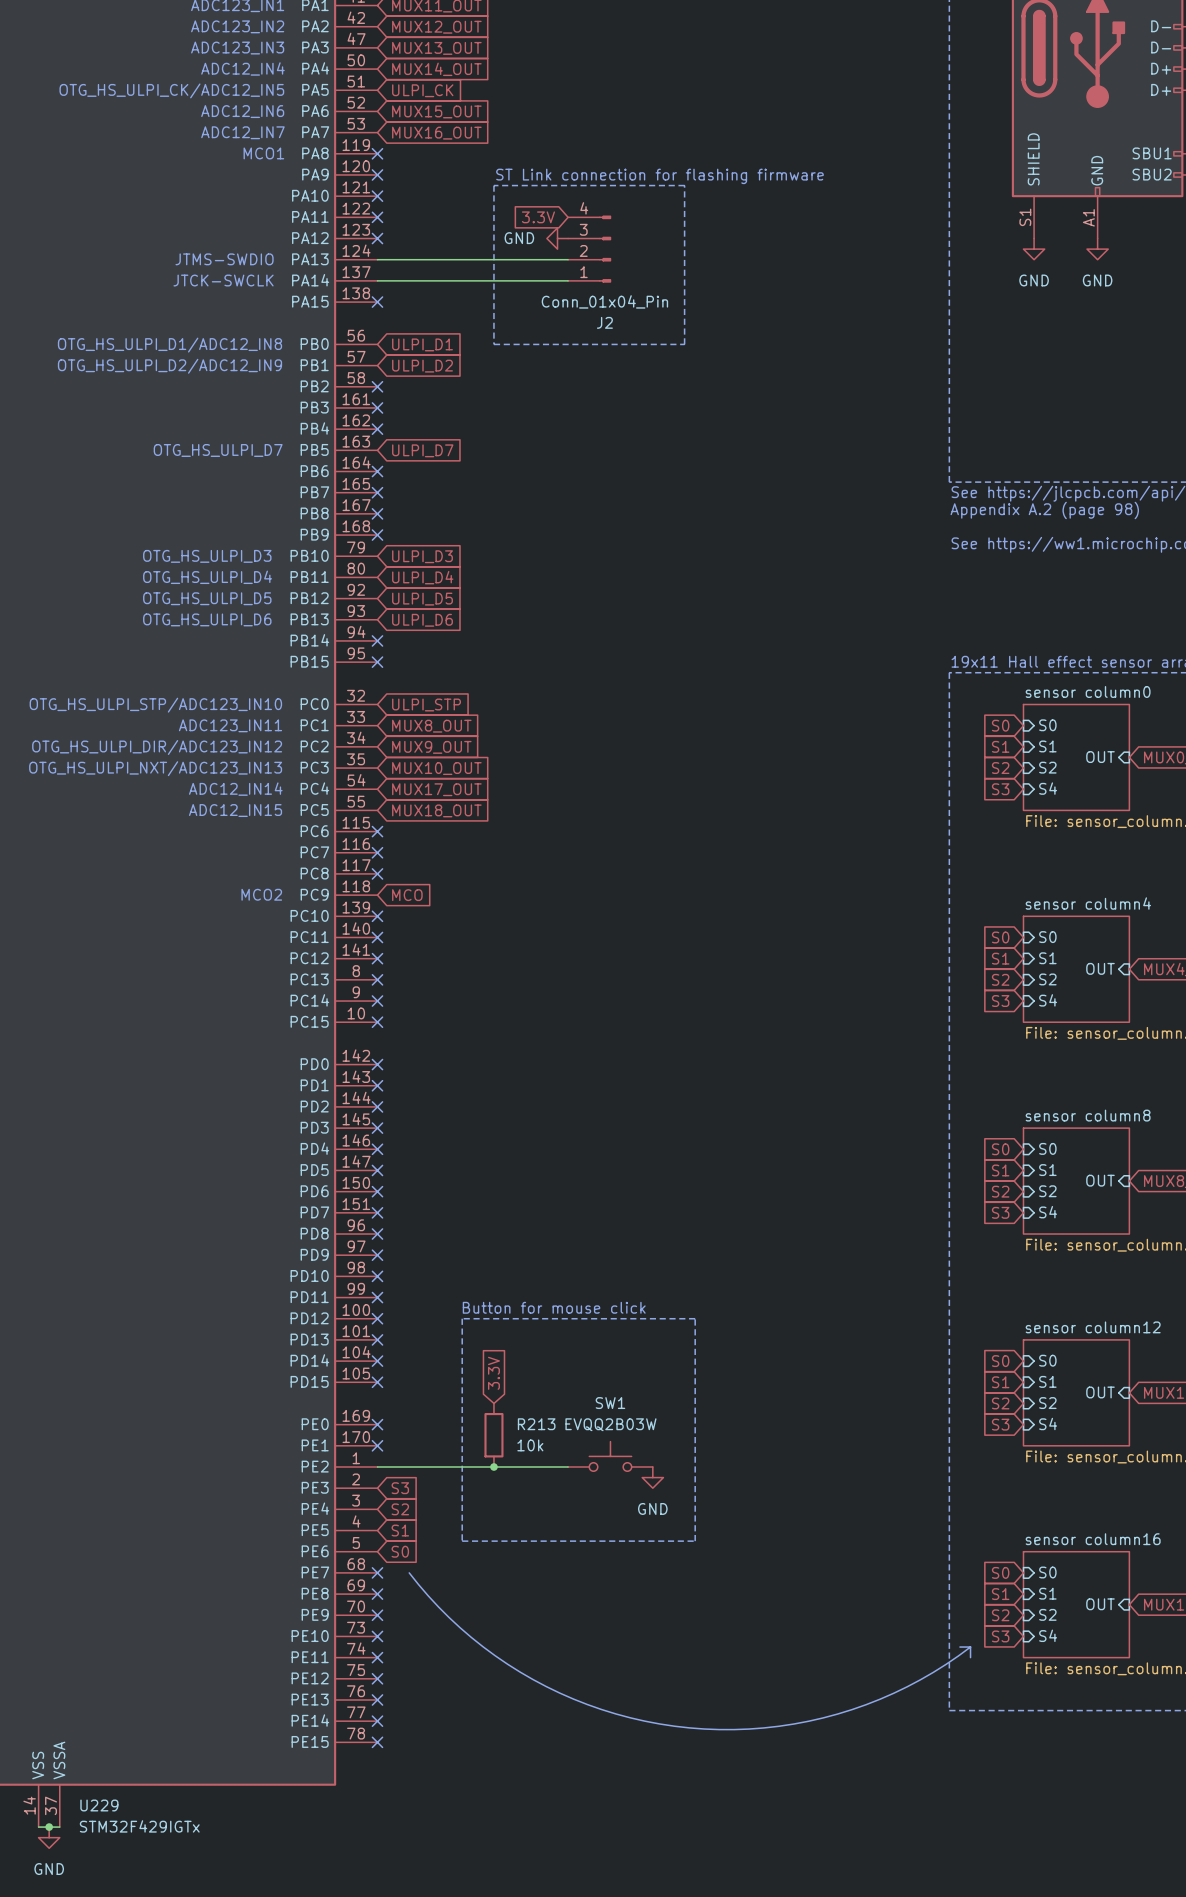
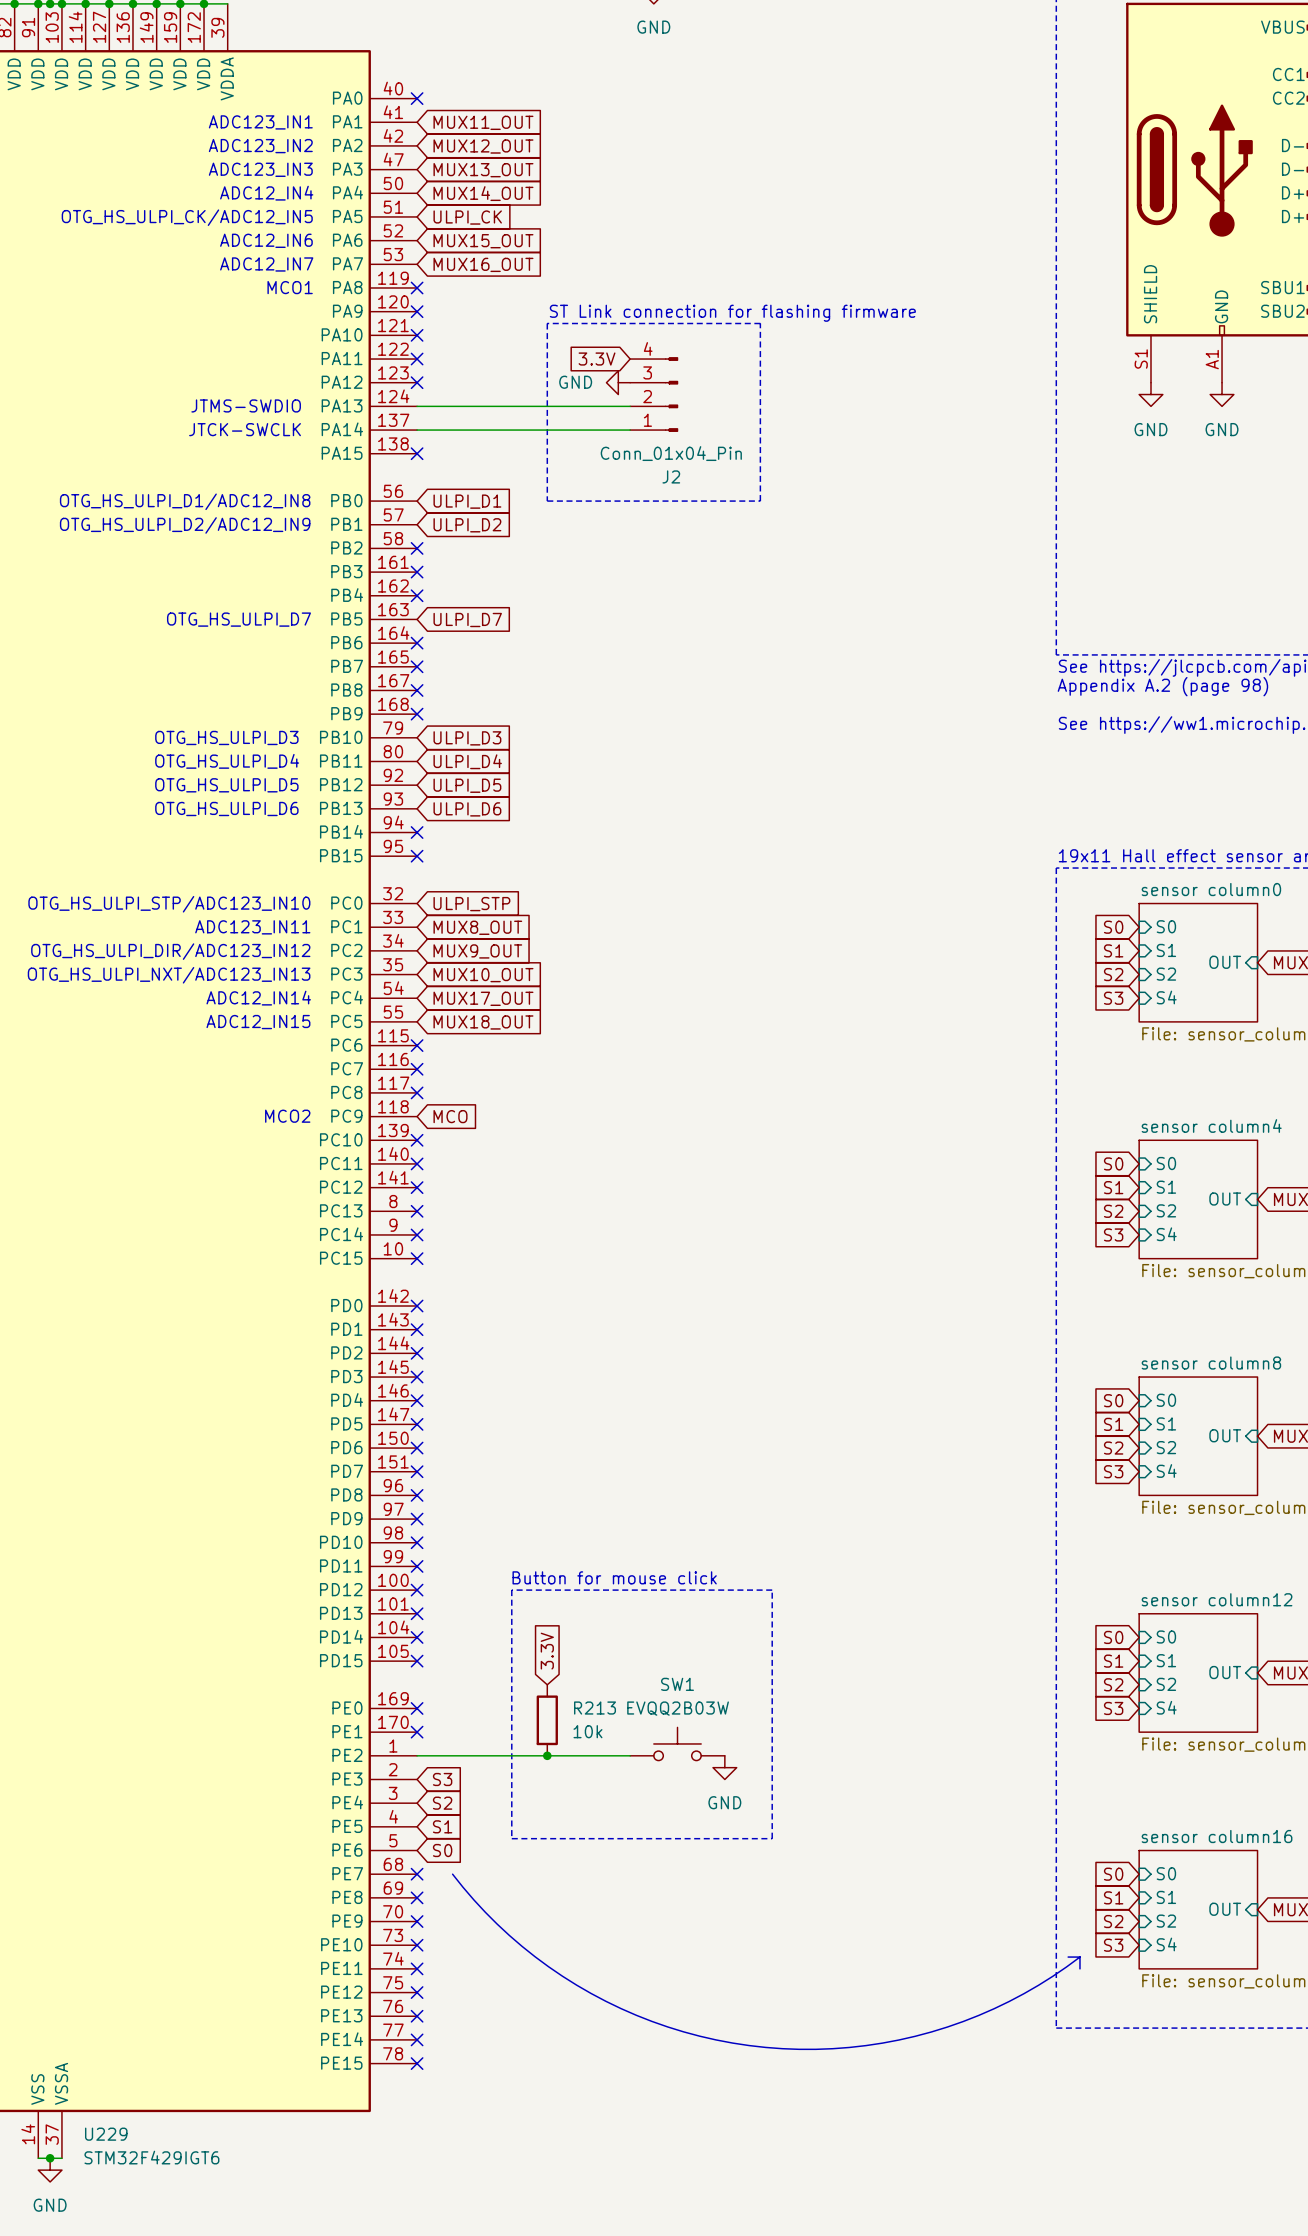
U229 value: STM32F429IGTx (139, 1826) -> STM32F429IGT6 (151, 2157)

